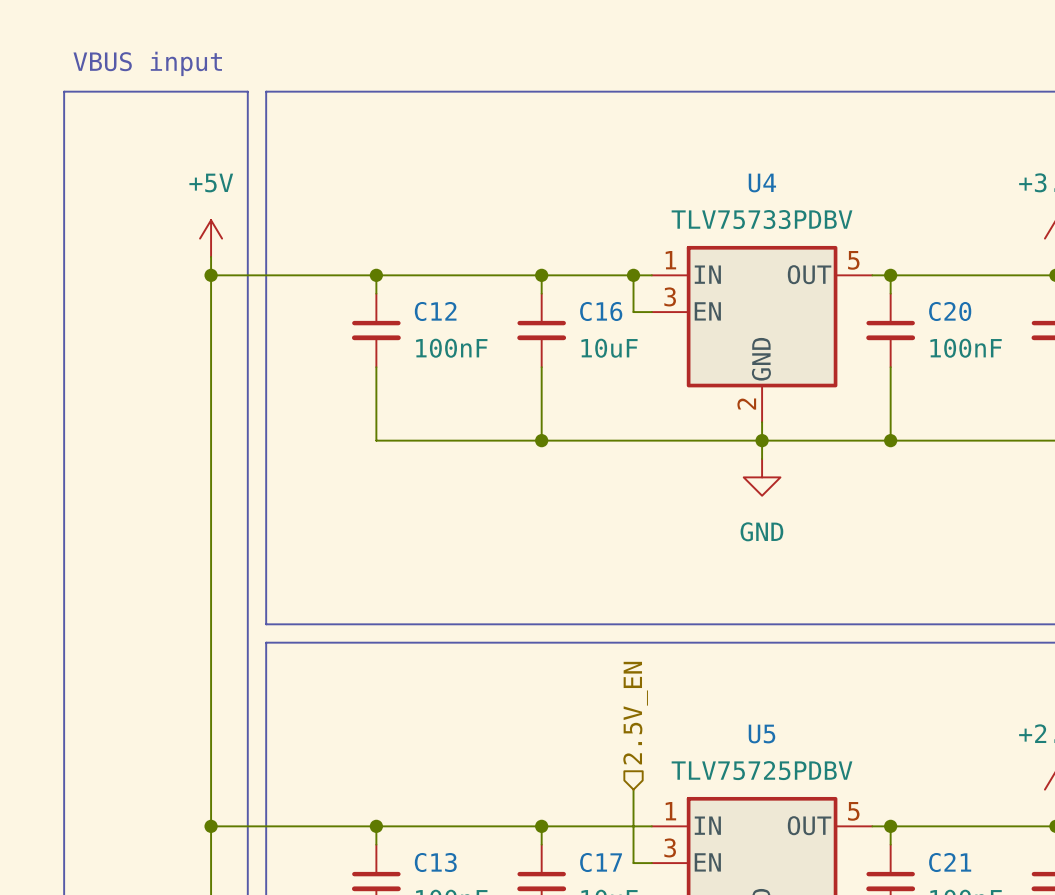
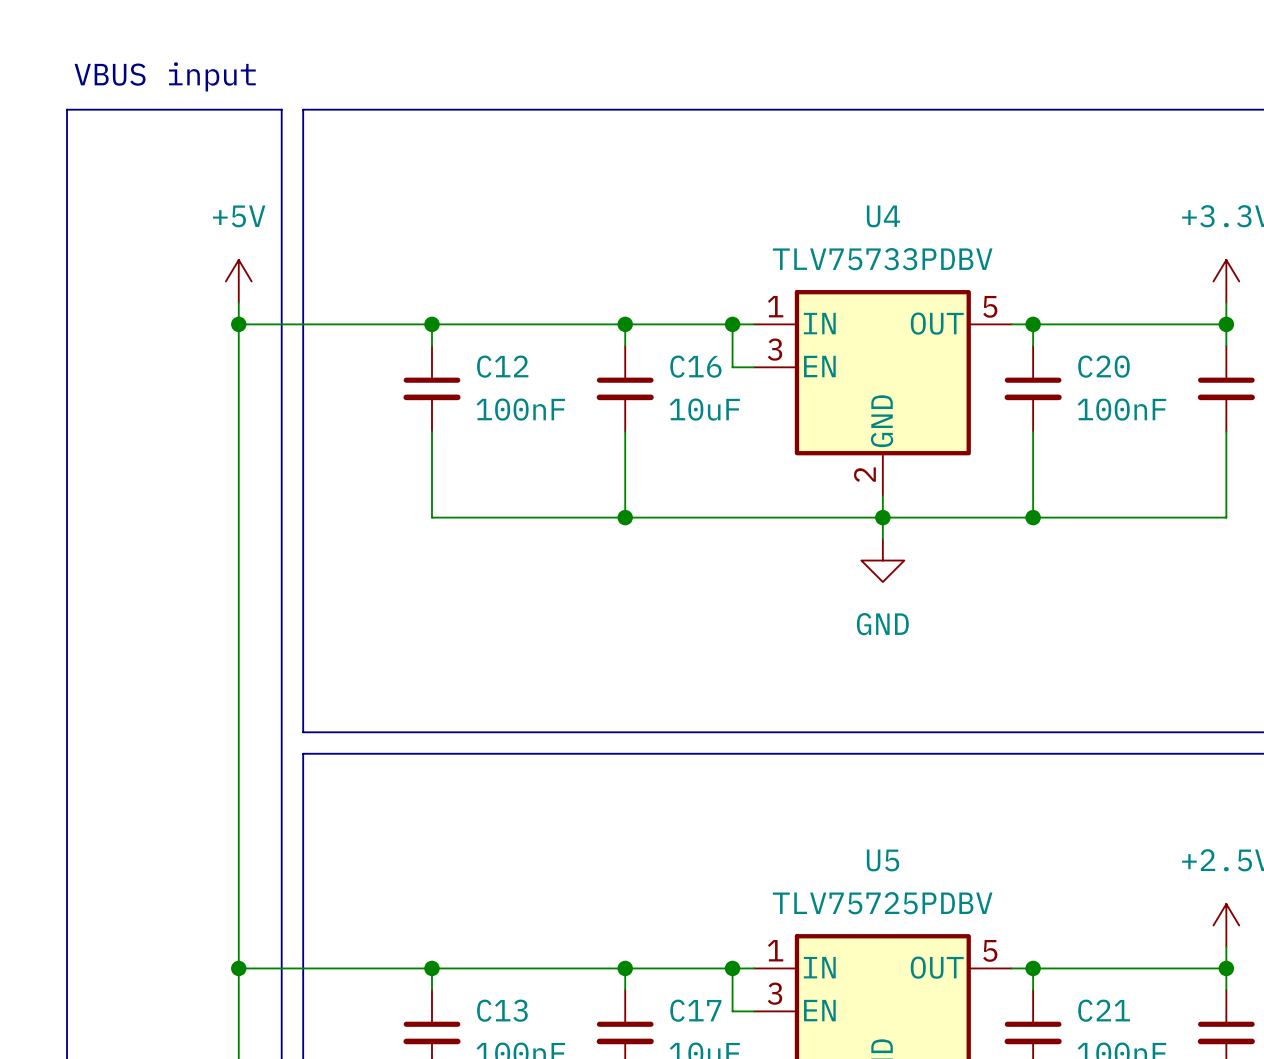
hierarchical label: 2.5V_EN (635, 713) -> none
wire: (633, 789) (633, 826) -> none
junction: none -> (732, 968)

